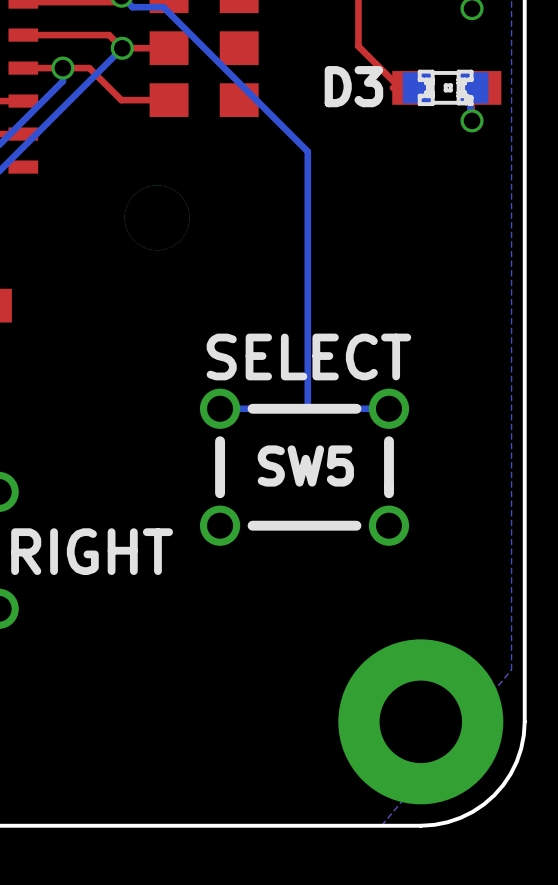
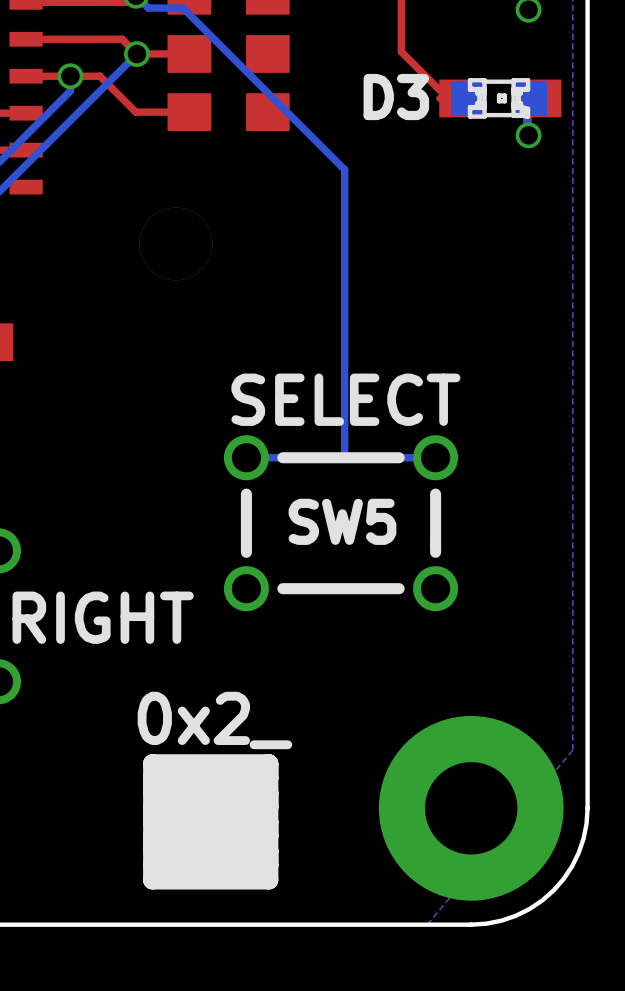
0x2_: none -> (210, 821)

